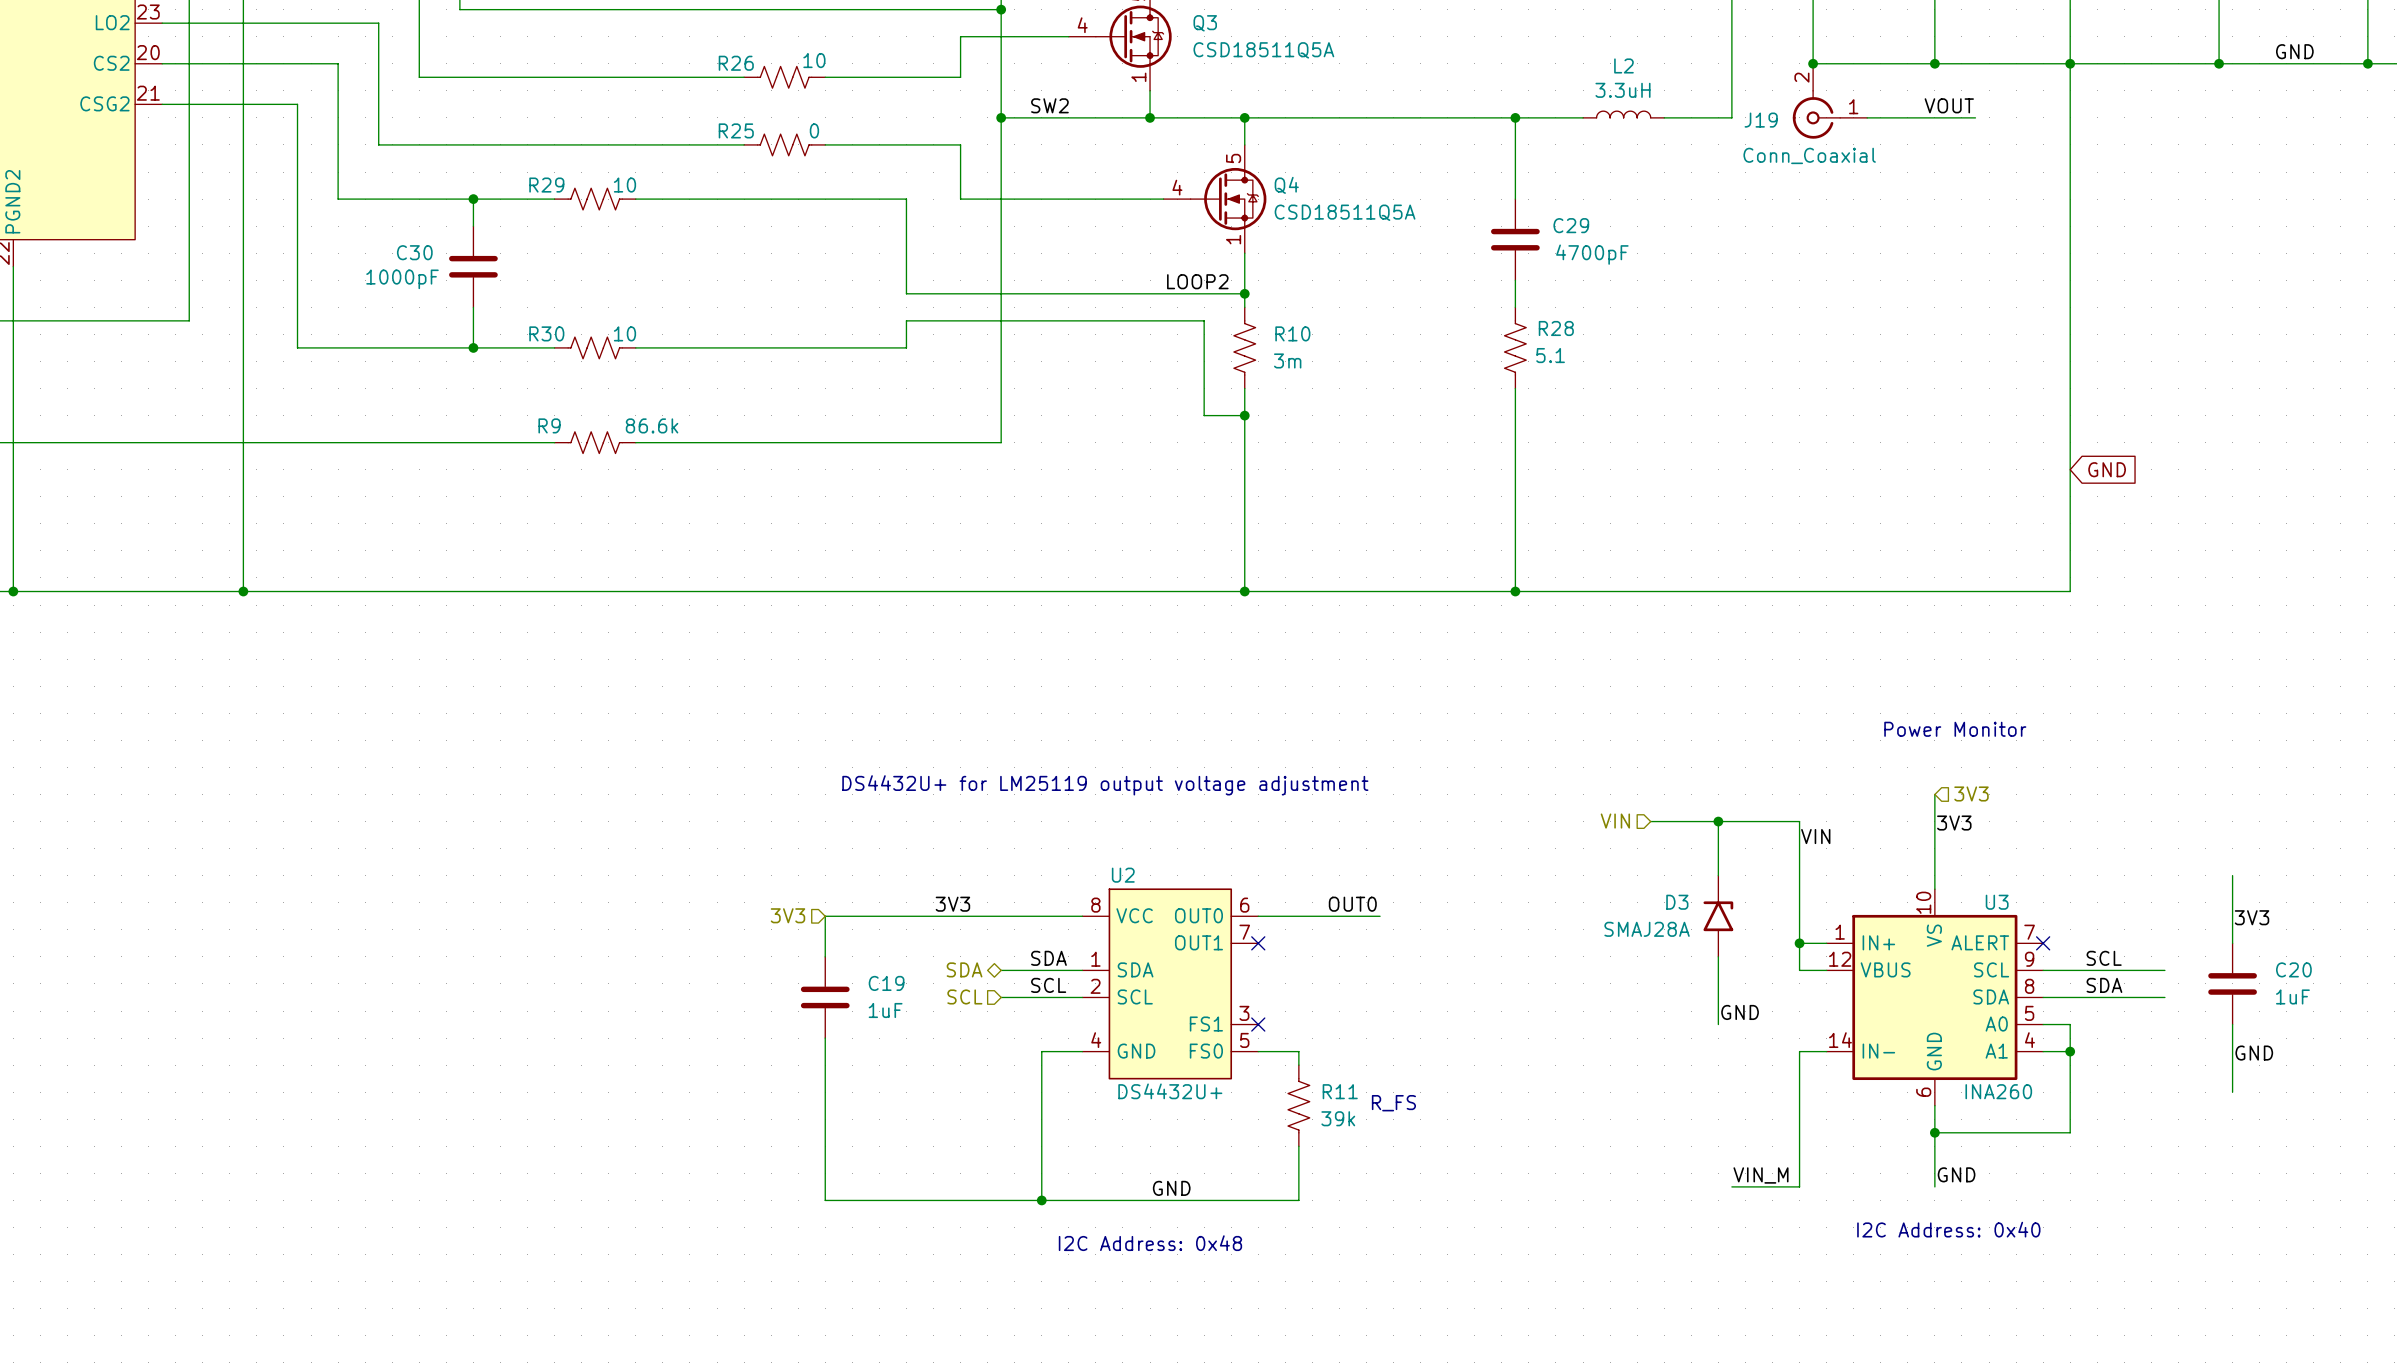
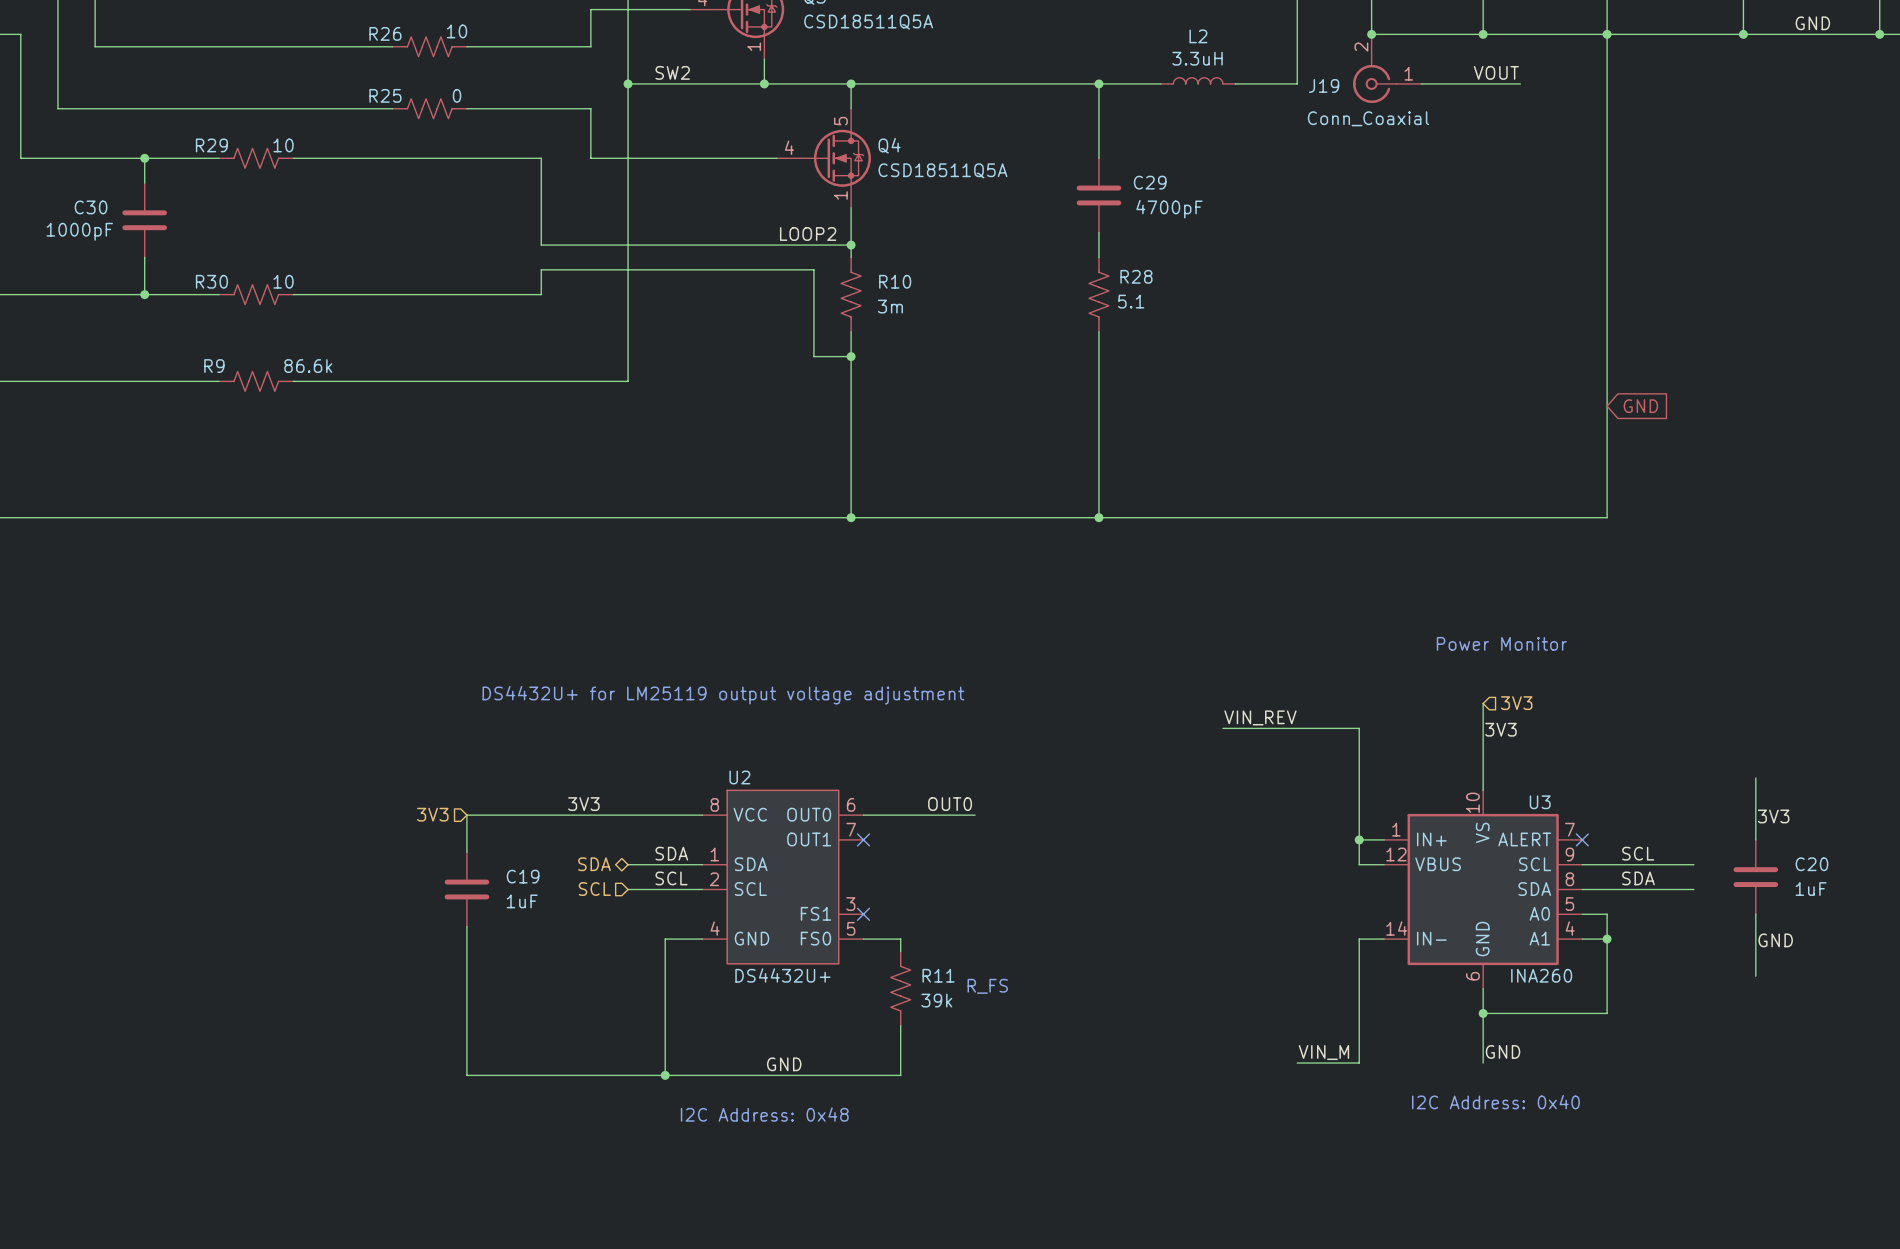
label: none -> VIN_REV (1260, 717)
hierarchical label: VIN (1615, 821) -> none
wire: (1718, 821) (1718, 875) -> none
junction: (1718, 821) -> none
label: VIN (1815, 836) -> none
D3: SMAJ28A (1718, 916) -> none
wire: (1718, 956) (1718, 1024) -> none
label: GND (1740, 1012) -> none

